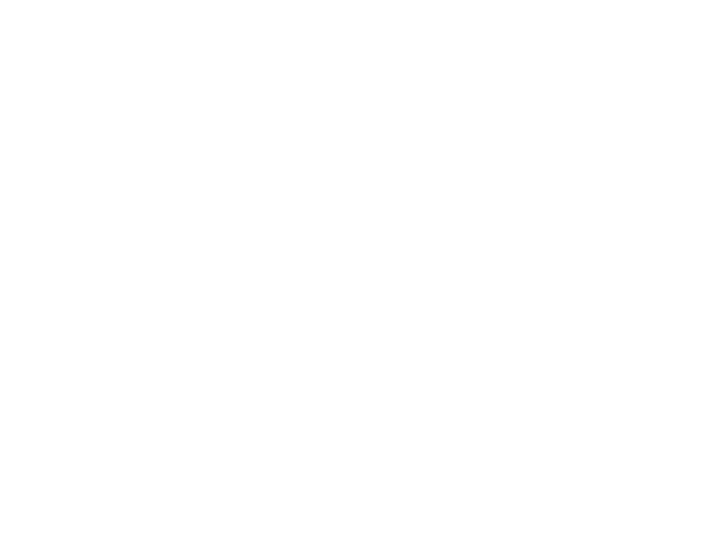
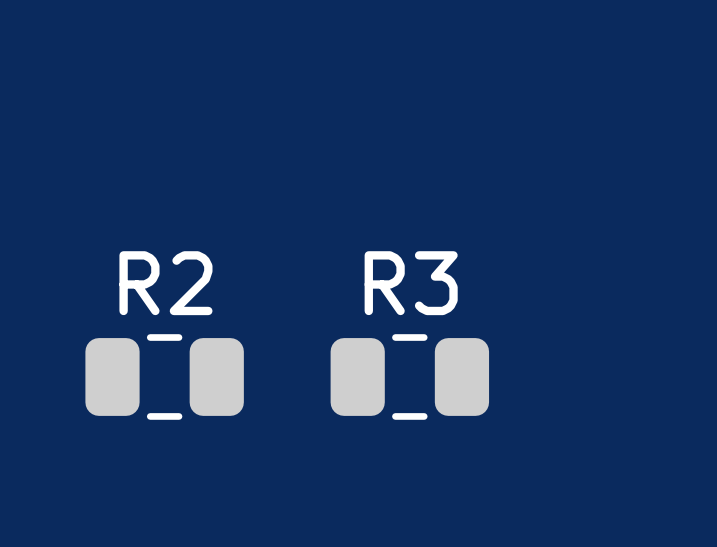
R2: none -> (164, 376)
R3: none -> (409, 376)

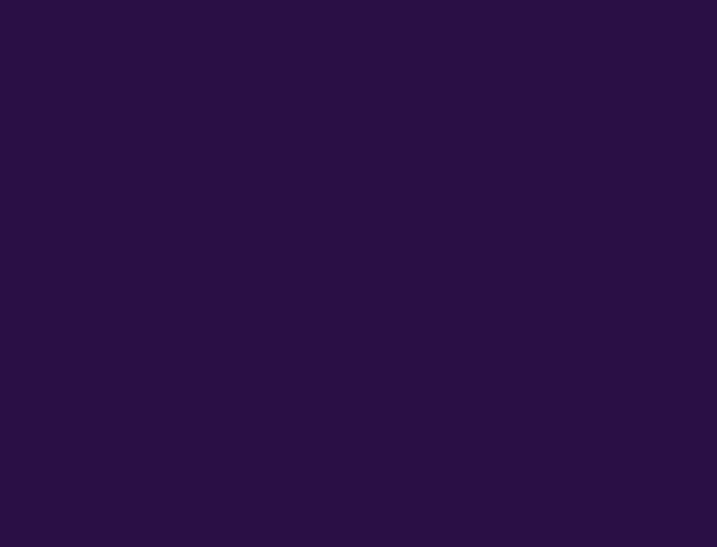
R2: (164, 376) -> none
R3: (409, 376) -> none

